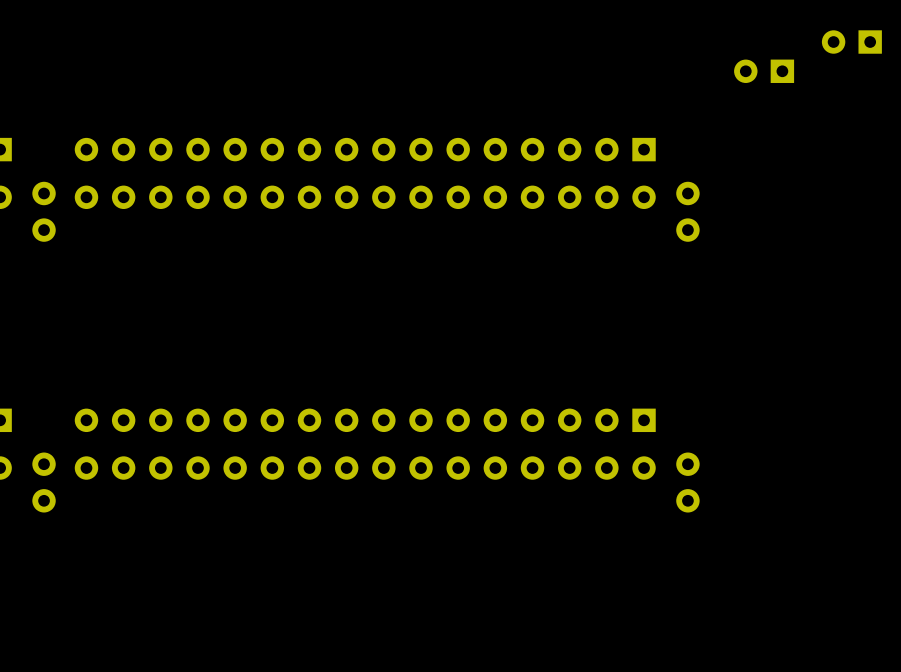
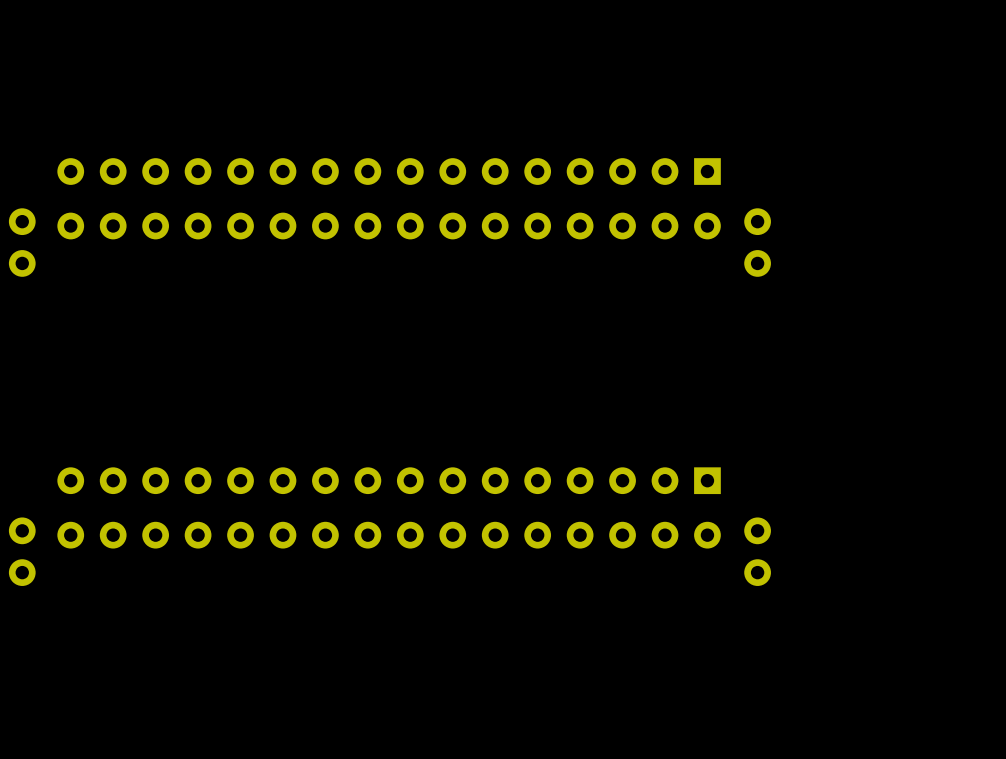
part: (851, 42) -> none
part: (764, 71) -> none

